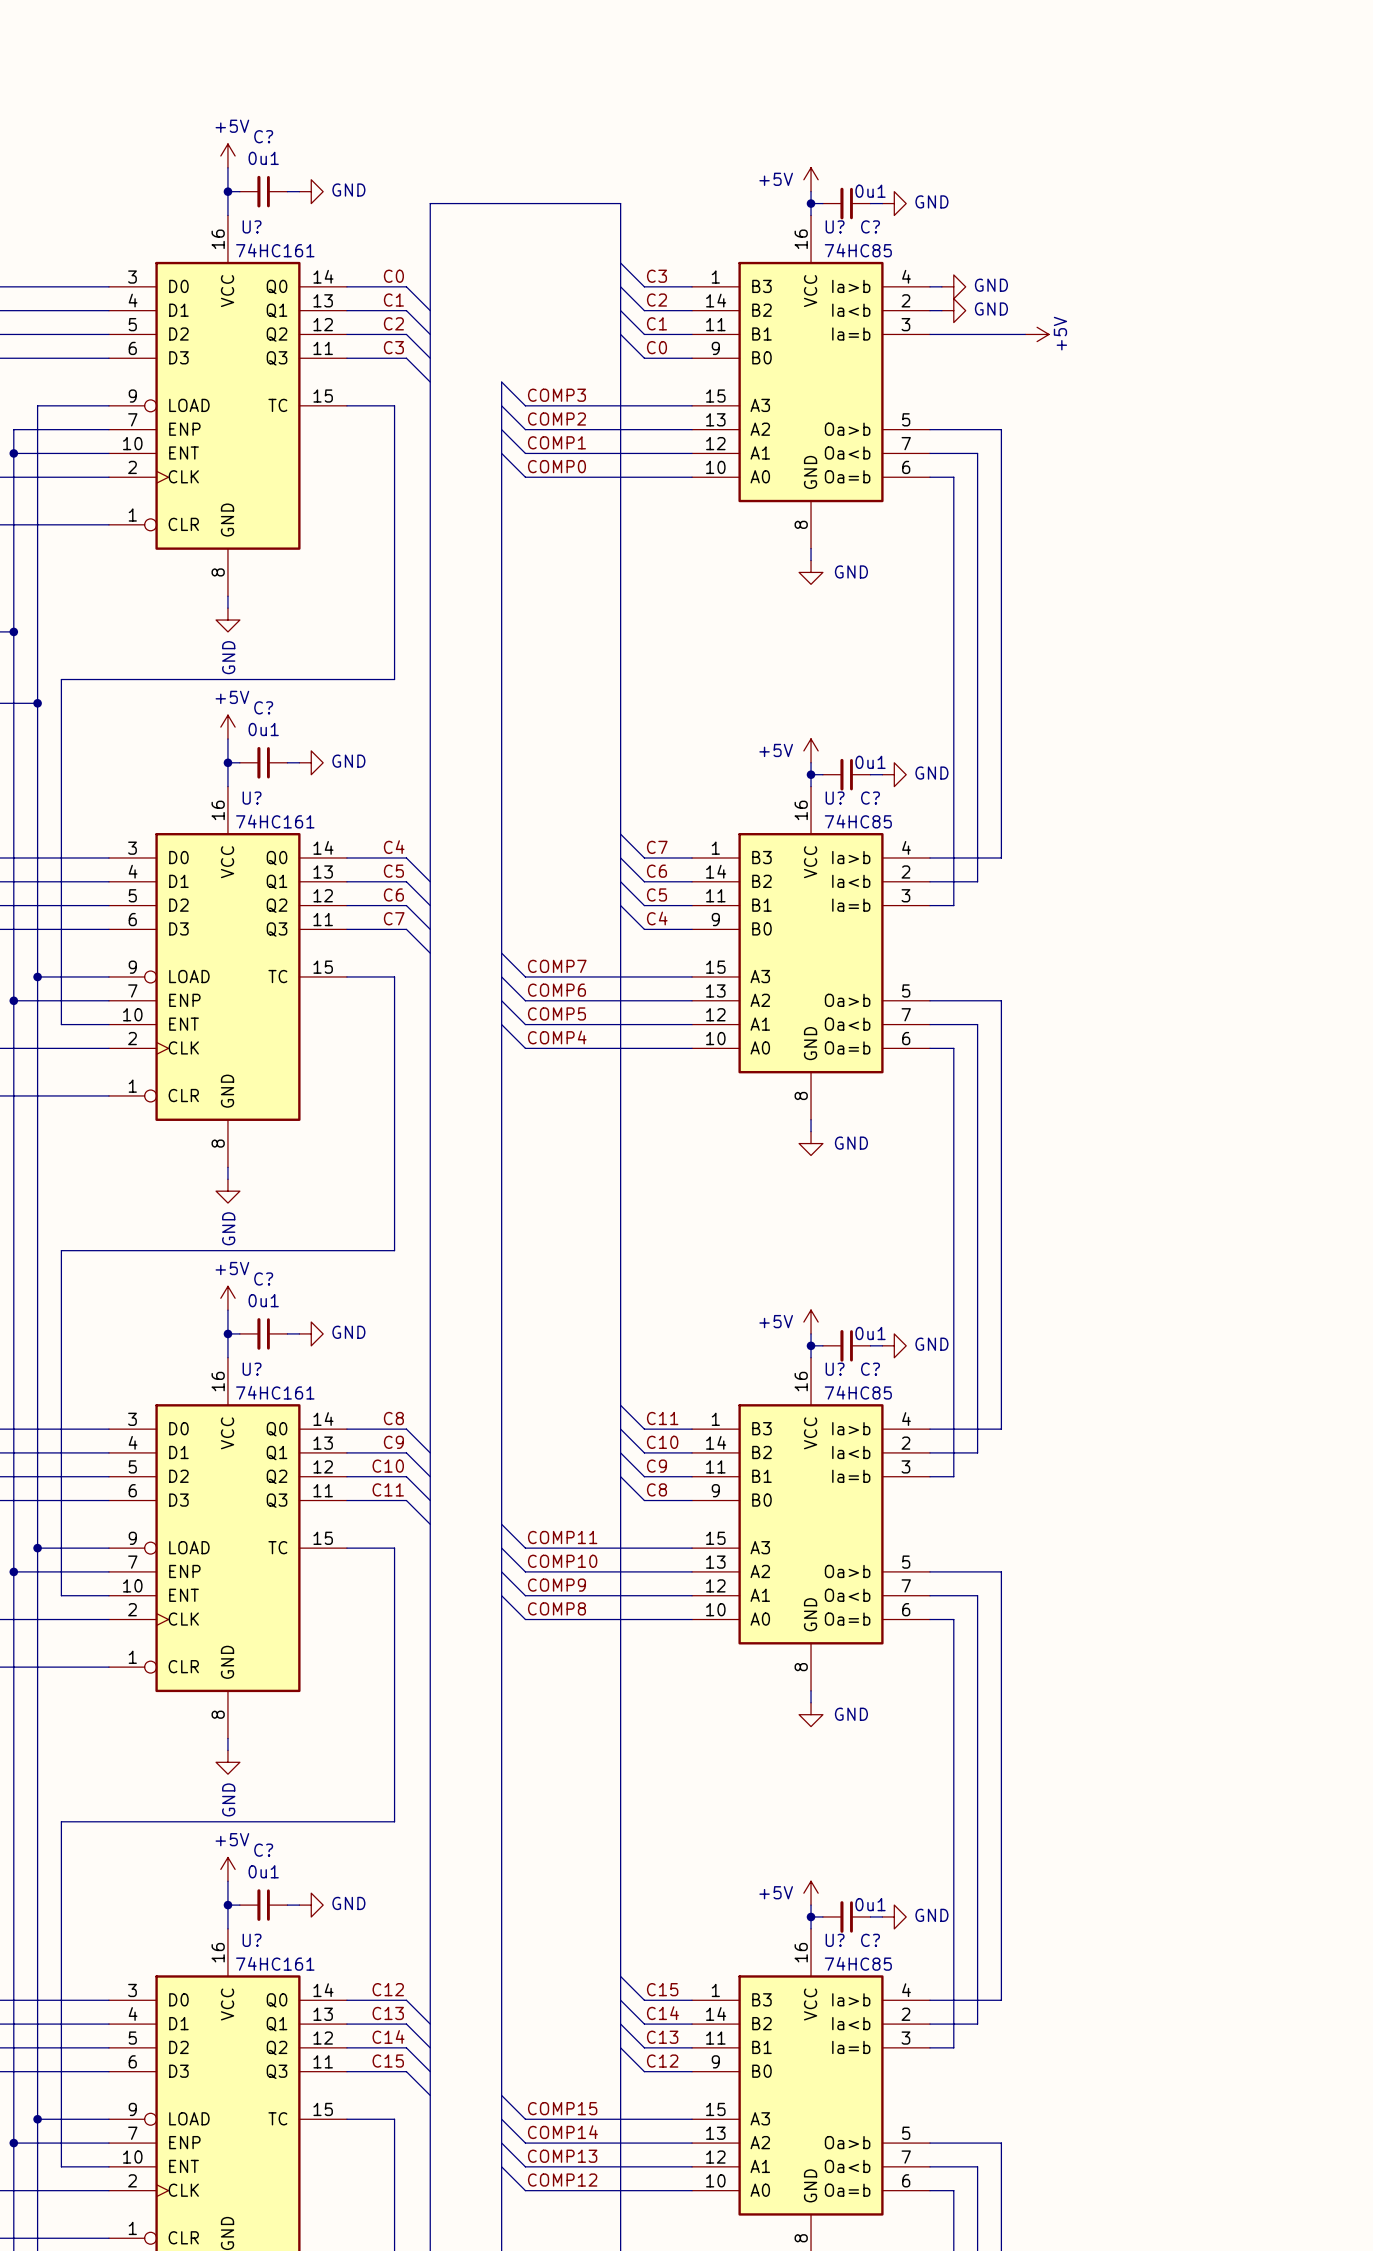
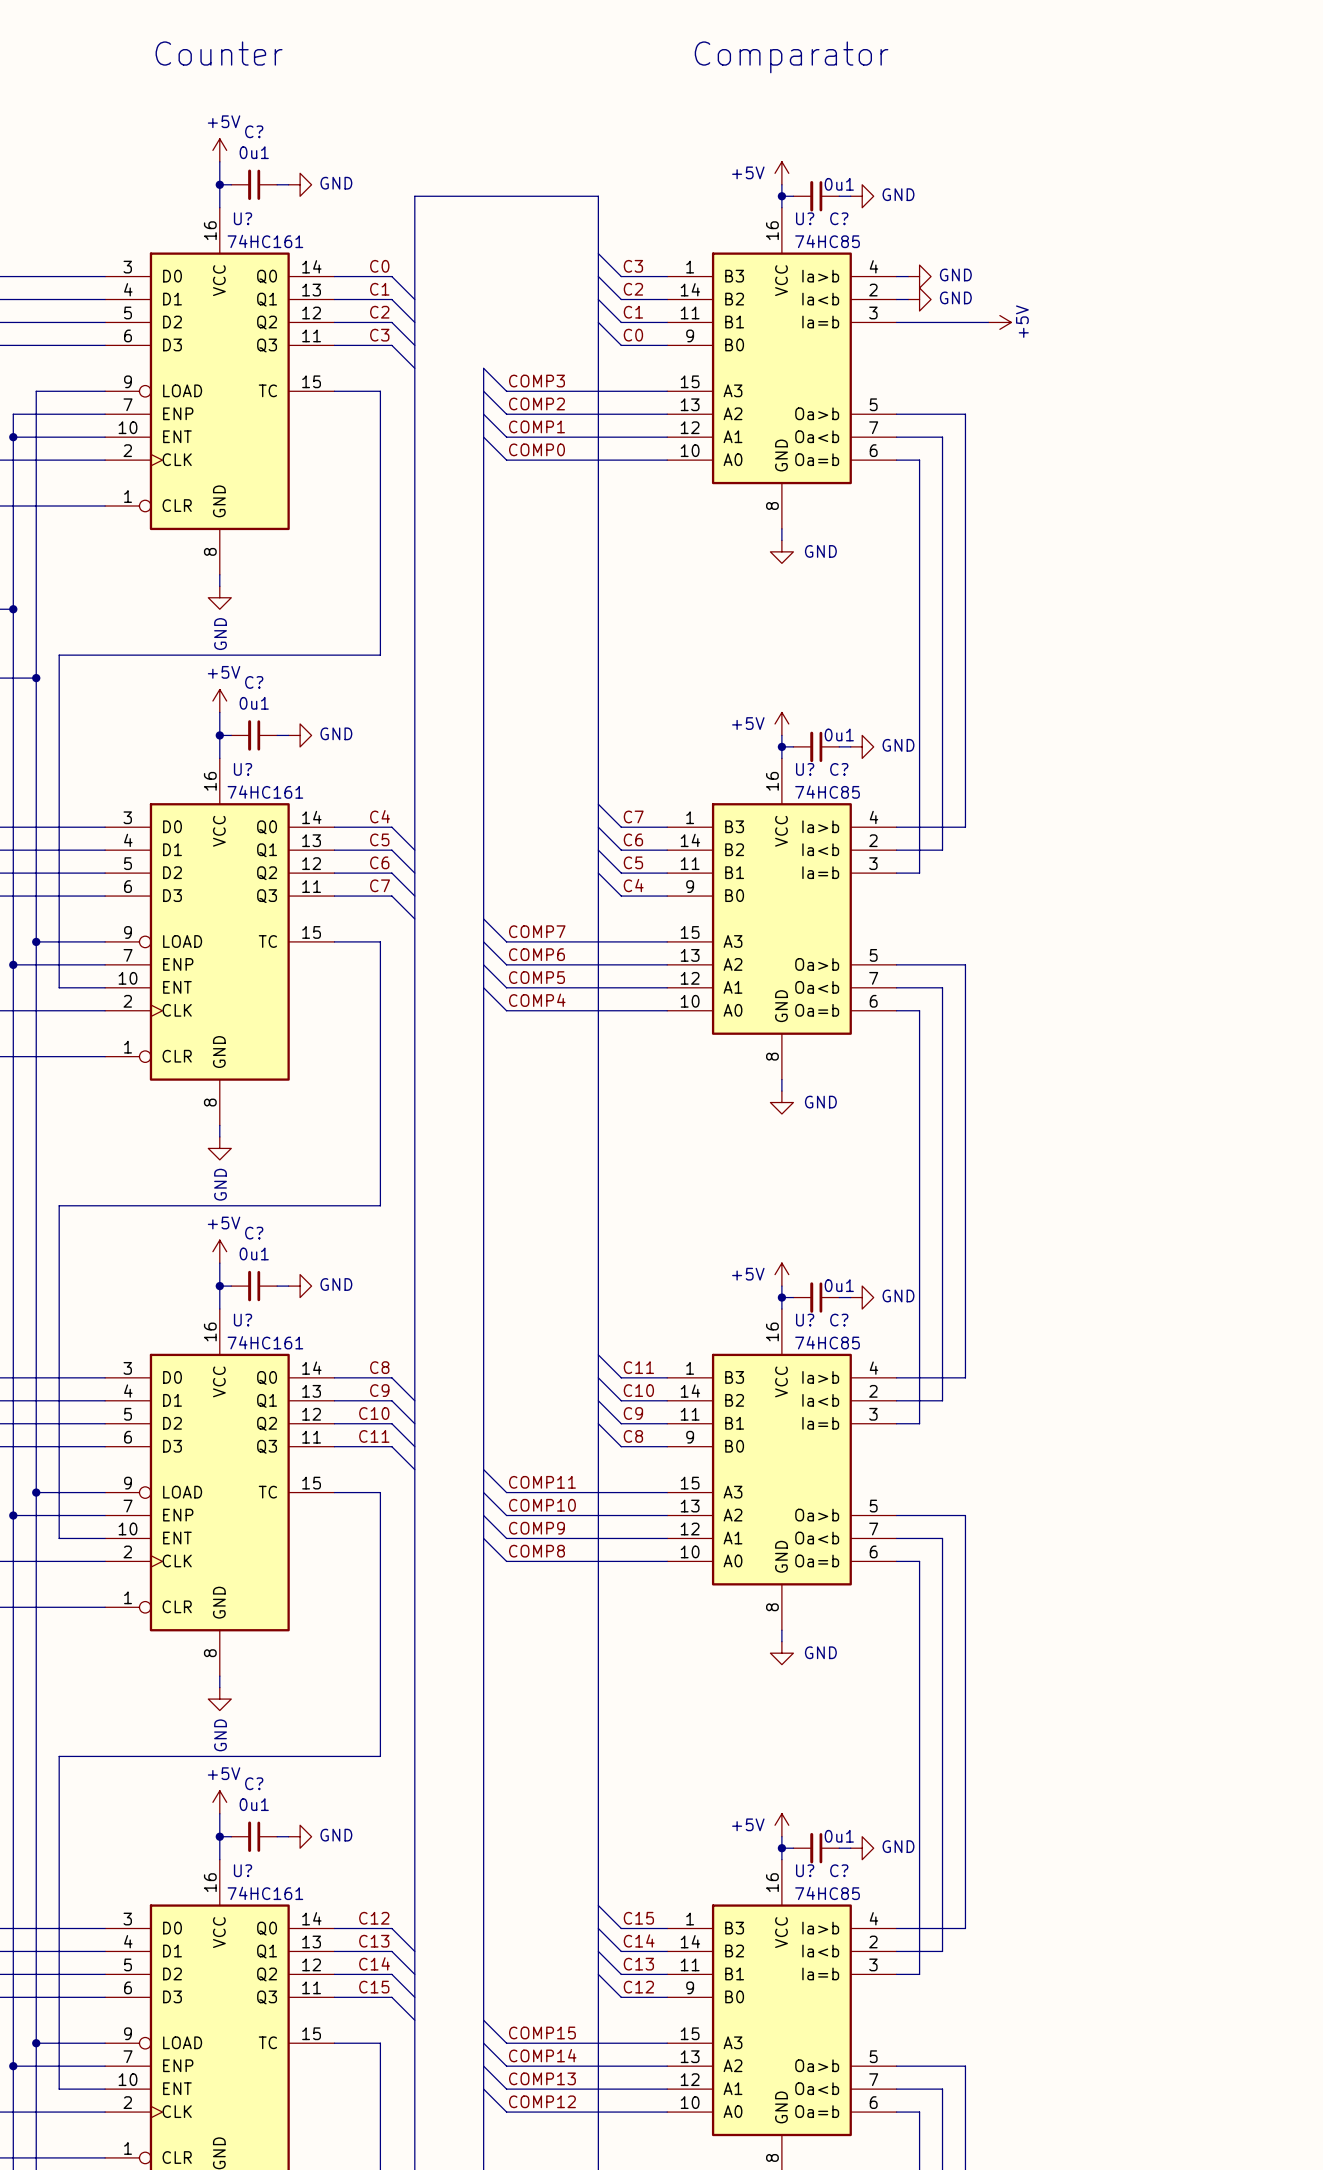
text: none -> Counter (219, 53)
text: none -> Comparator (791, 57)

